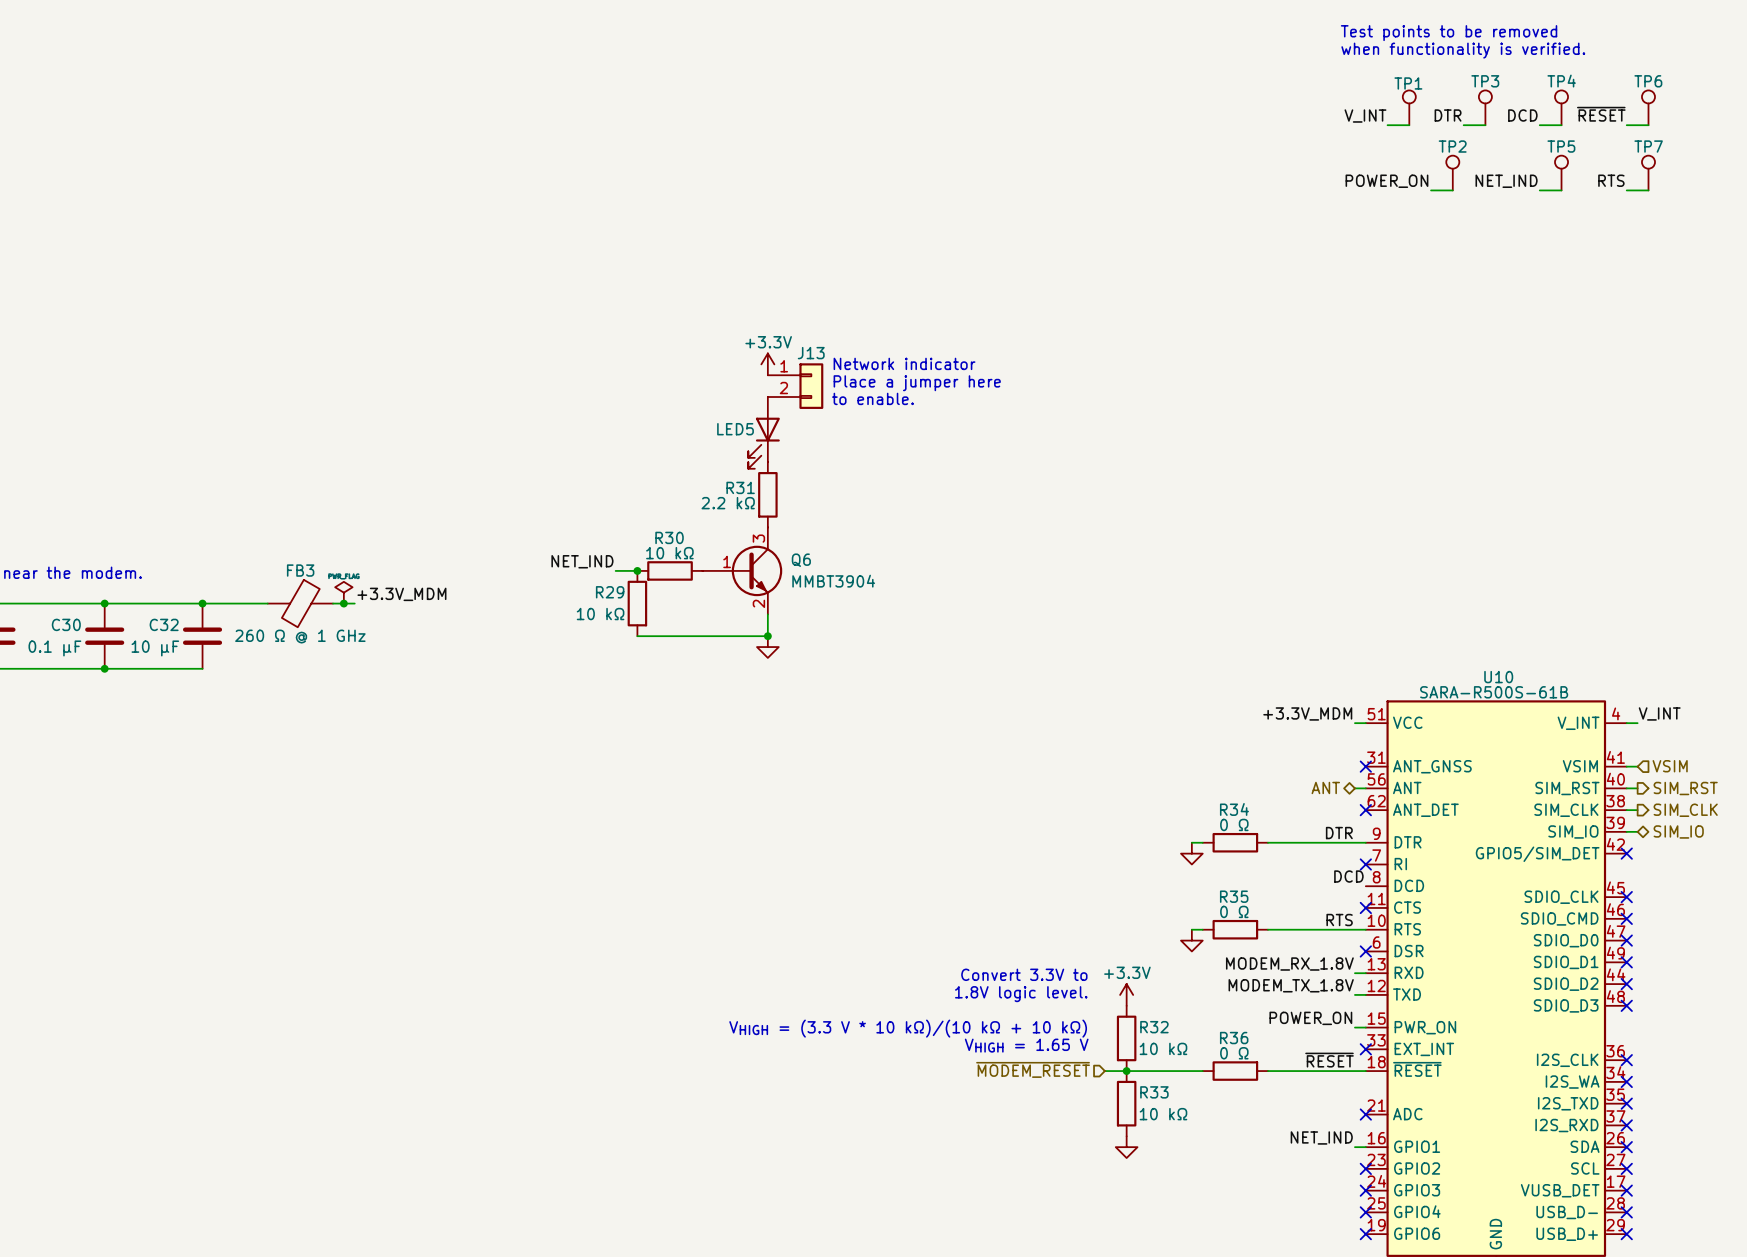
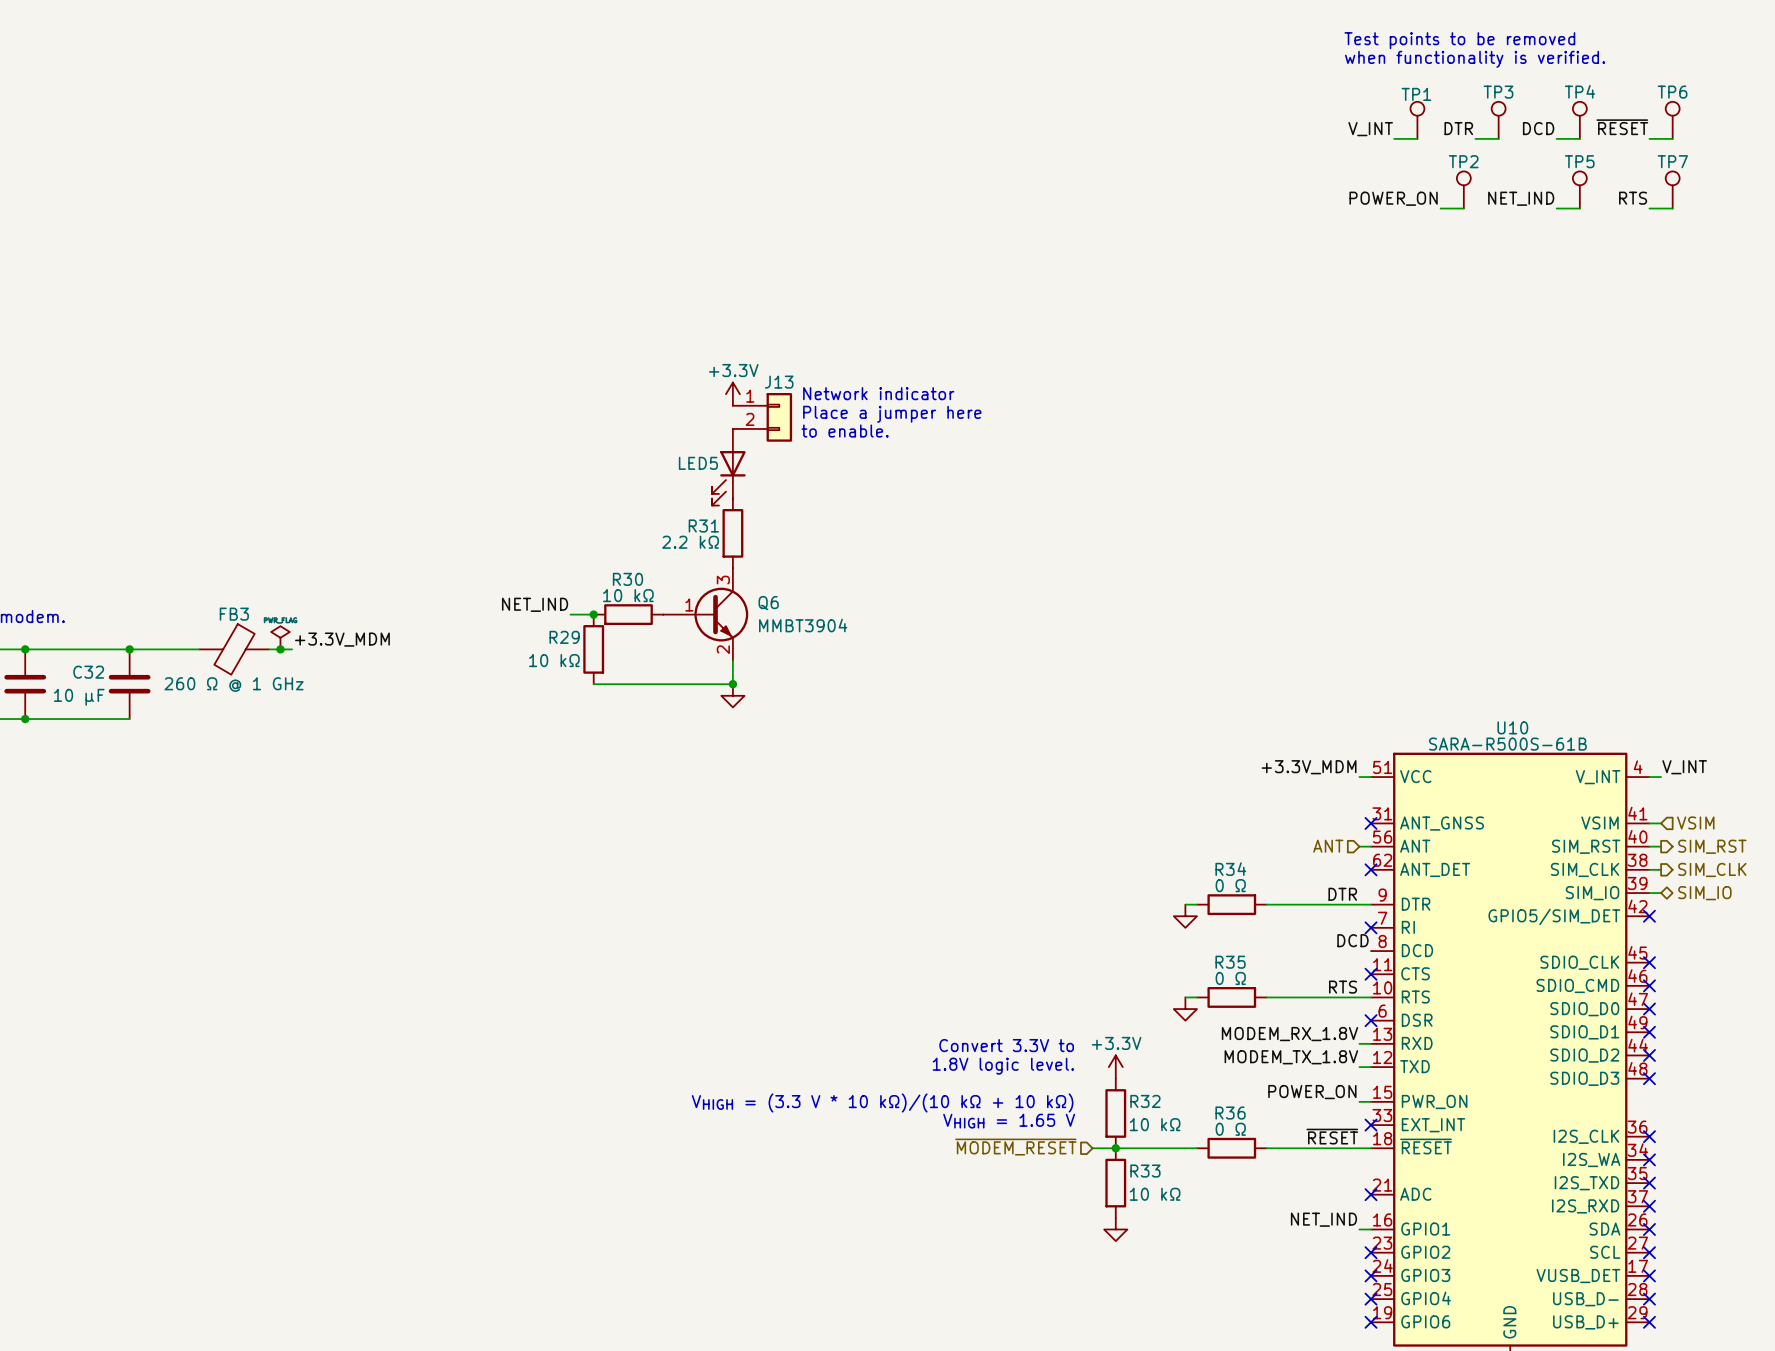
hierarchical label shape: bidirectional (1325, 787) -> input (1328, 846)

